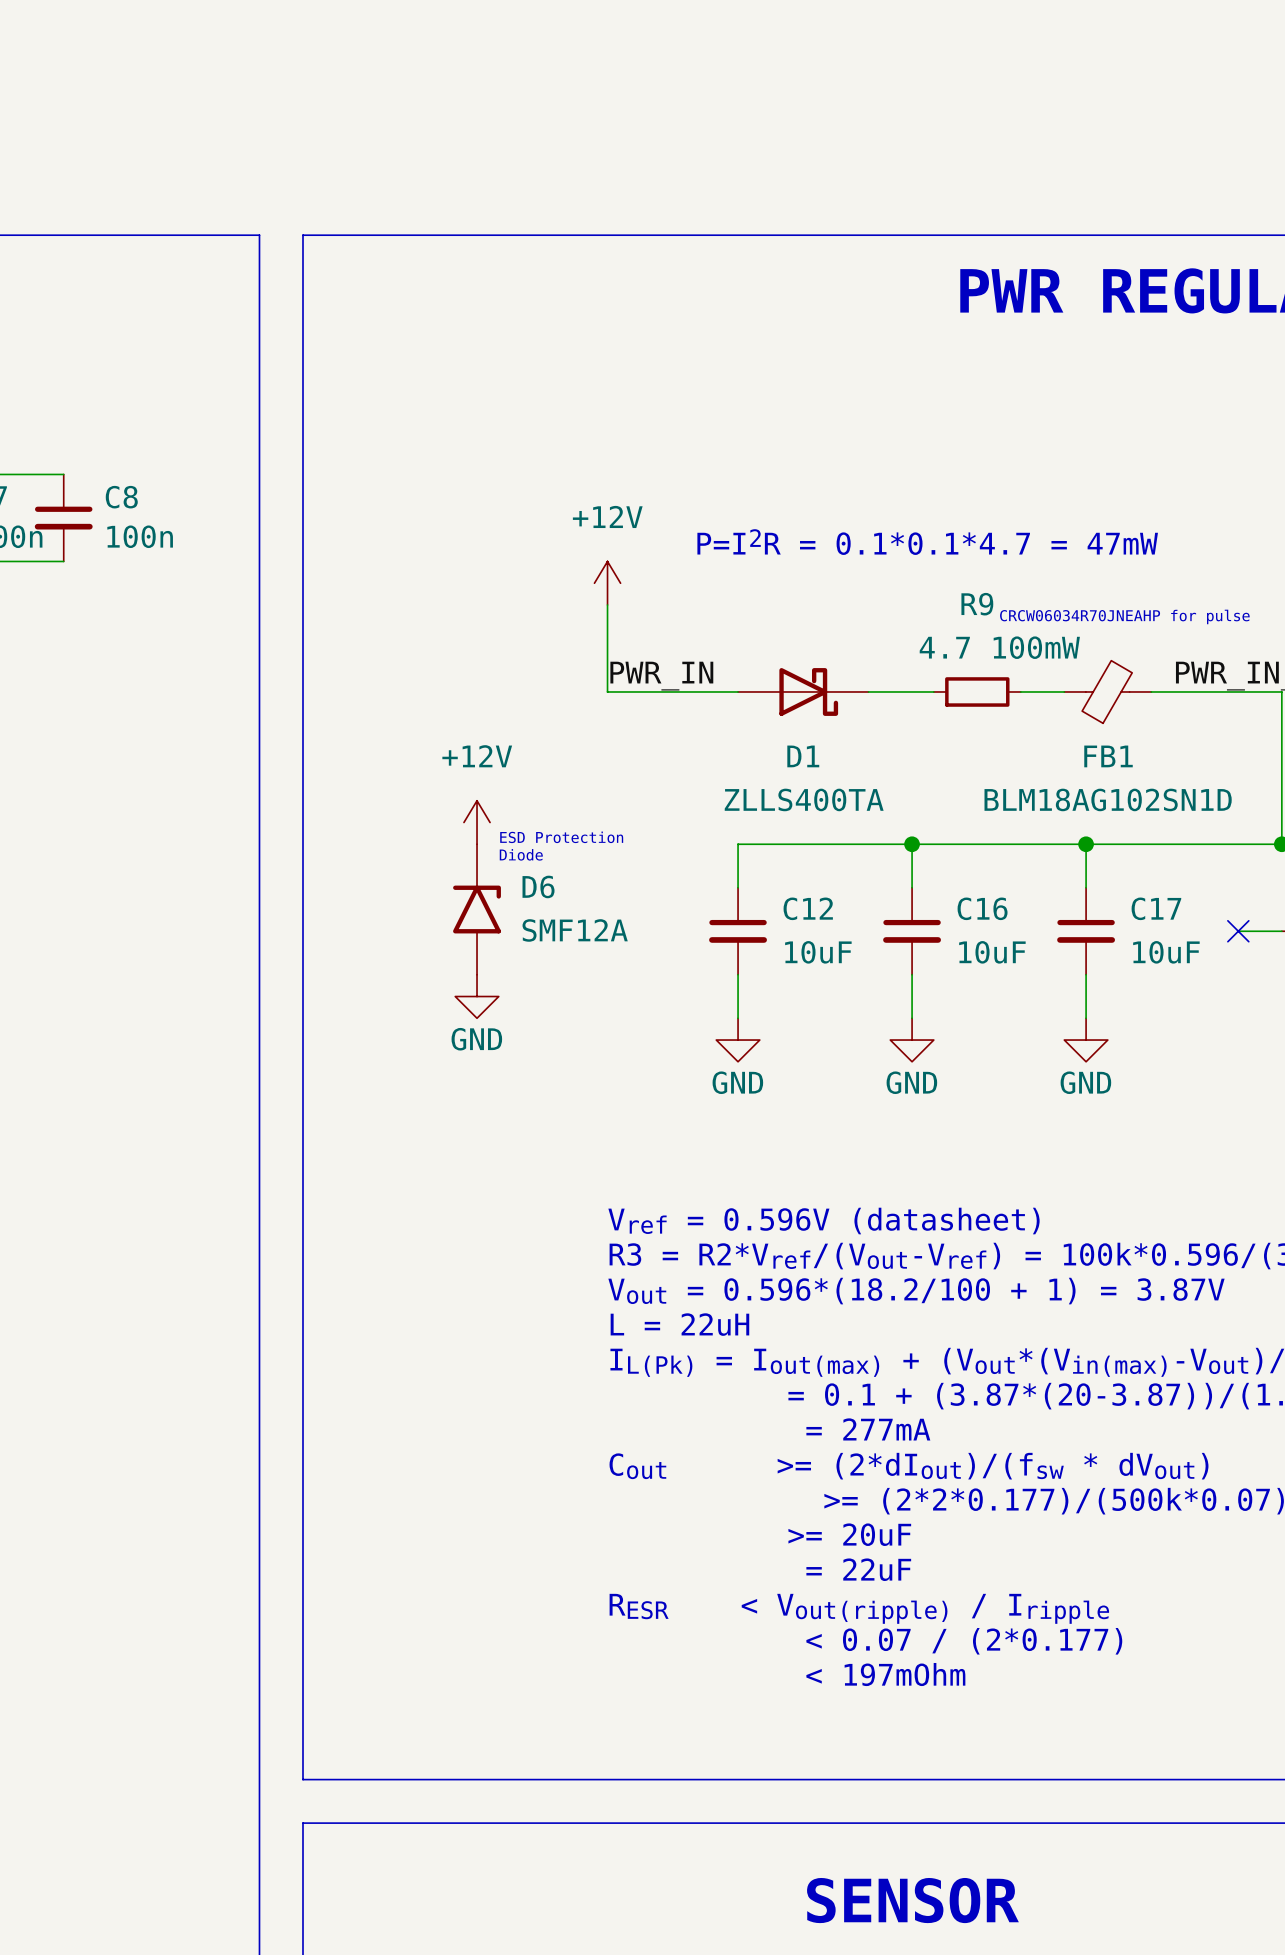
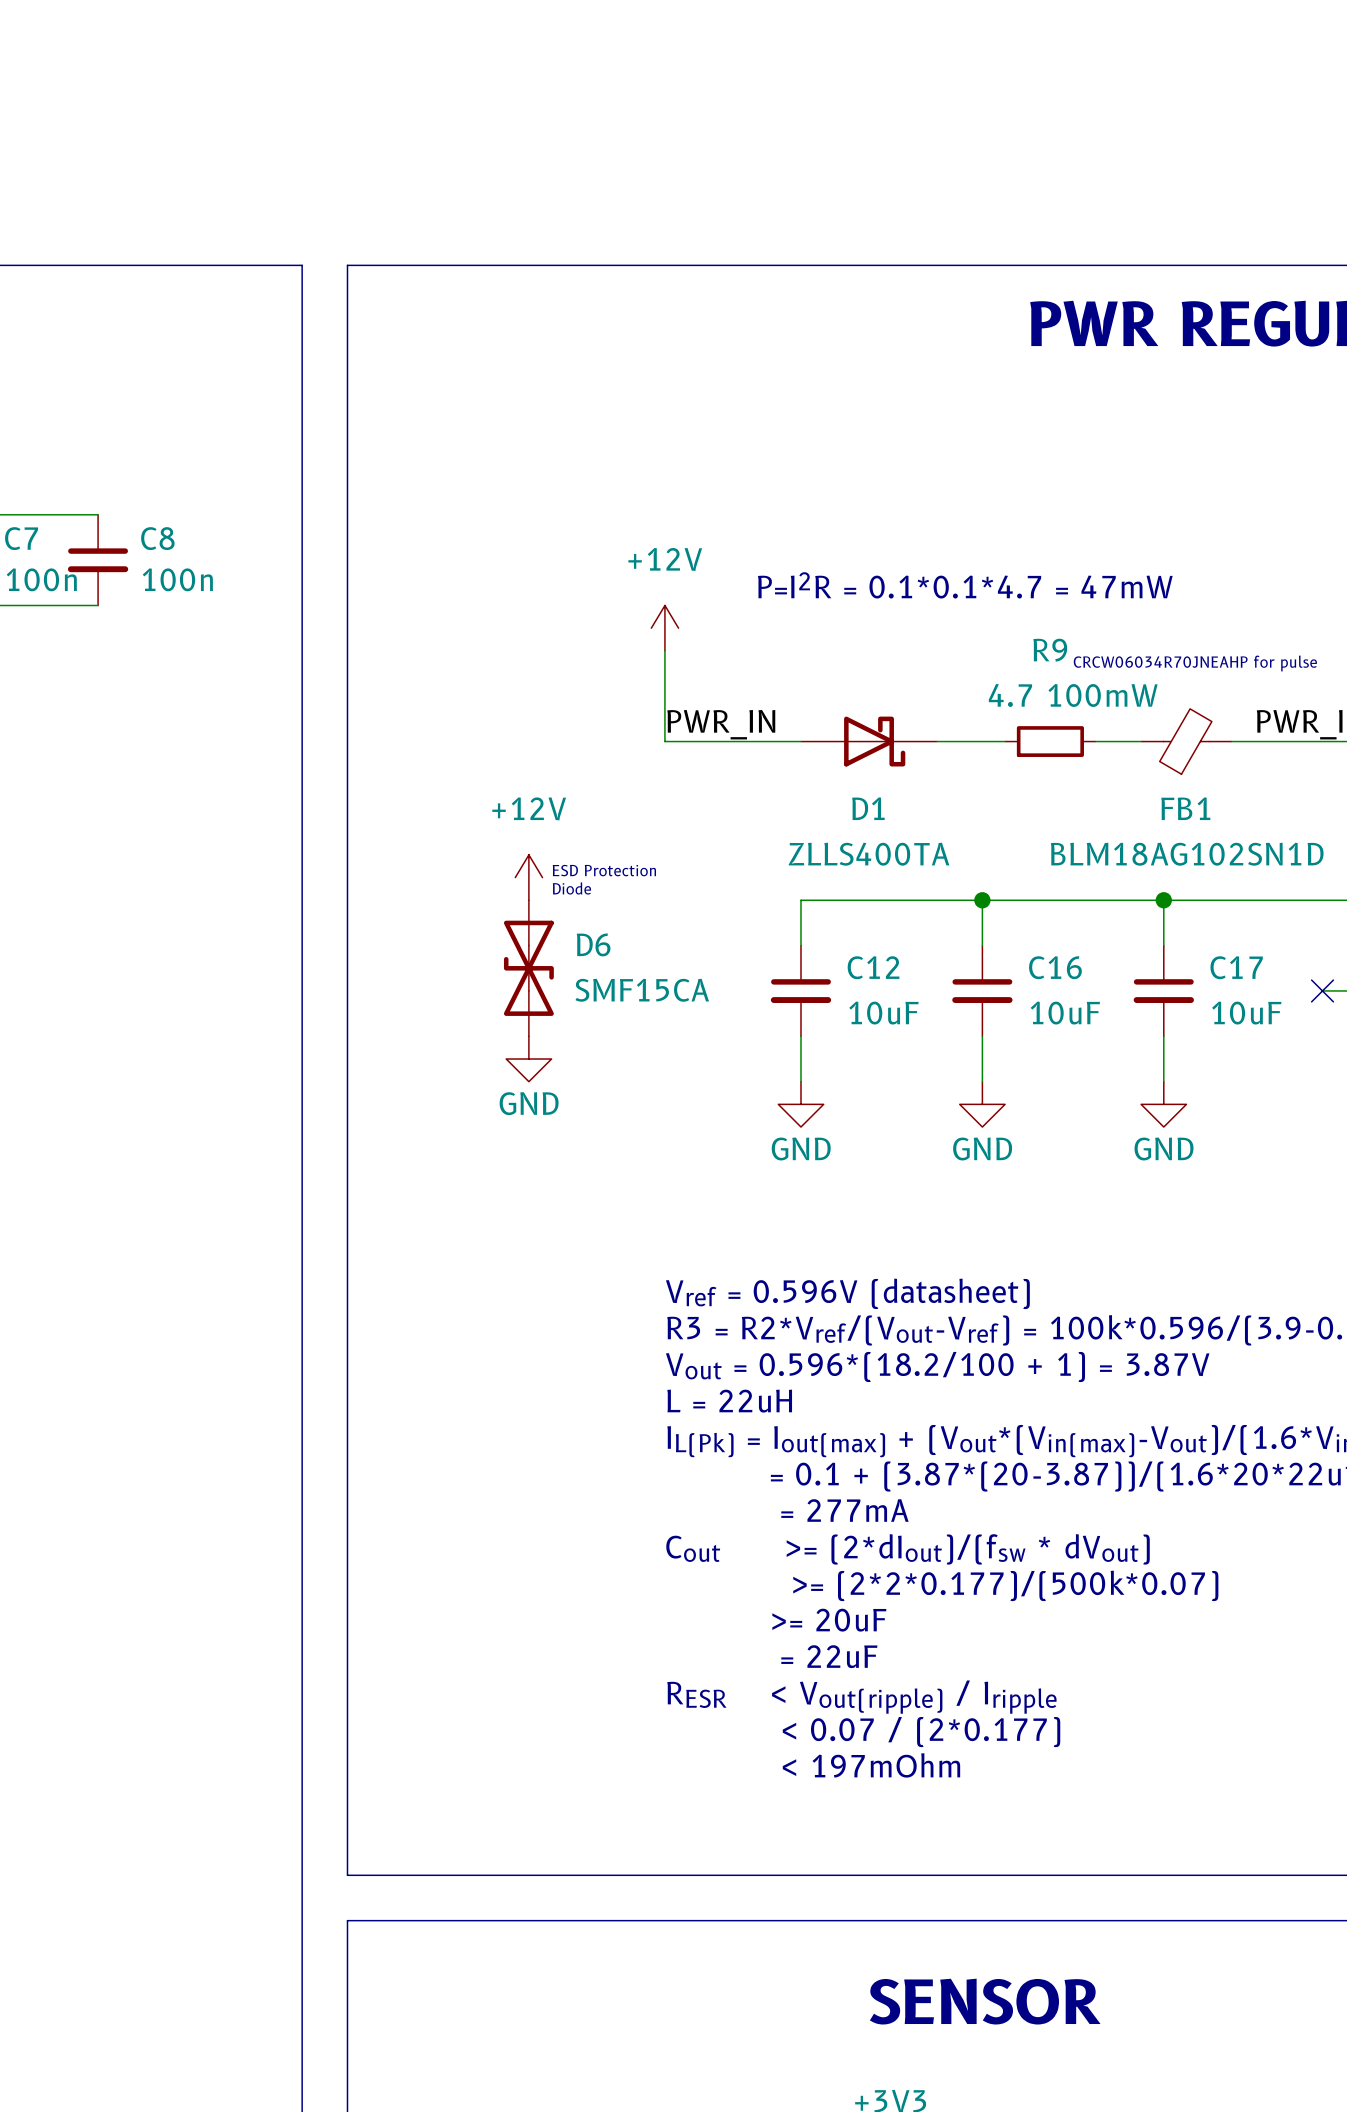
text: none -> ESD Protection (604, 870)
text: ESD Protection (561, 837) -> Diode (571, 888)
D6 symbol: [453, 844, 501, 975] -> [503, 900, 554, 1037]
text: Diode (521, 854) -> none
D6 value: SMF12A (575, 930) -> SMF15CA (642, 990)

